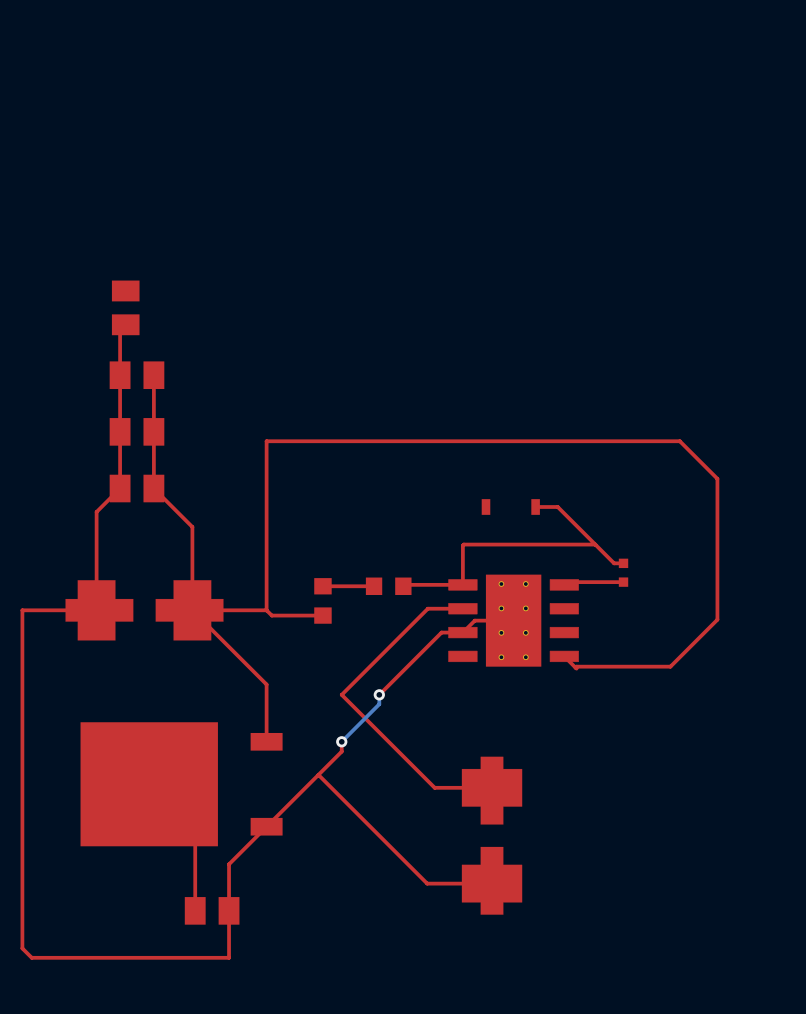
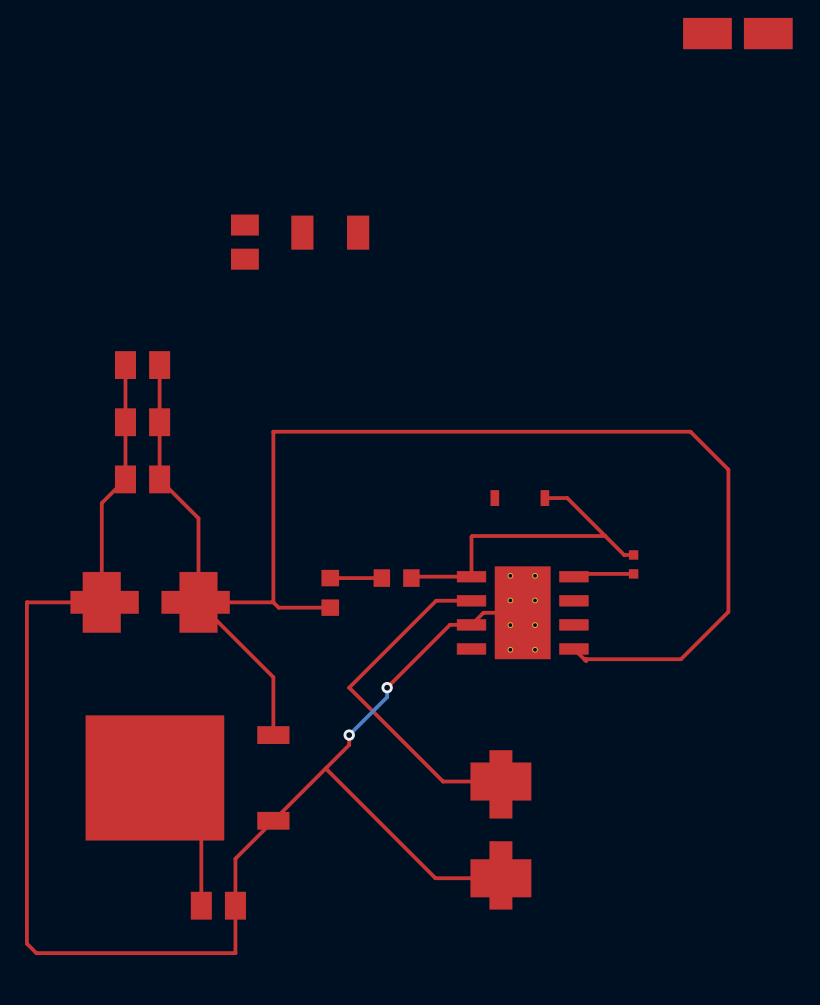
part: none -> (737, 33)
part: none -> (330, 232)
part position: (125, 307) -> (244, 242)
top track: (125, 324) (120, 330) (120, 375) -> none

